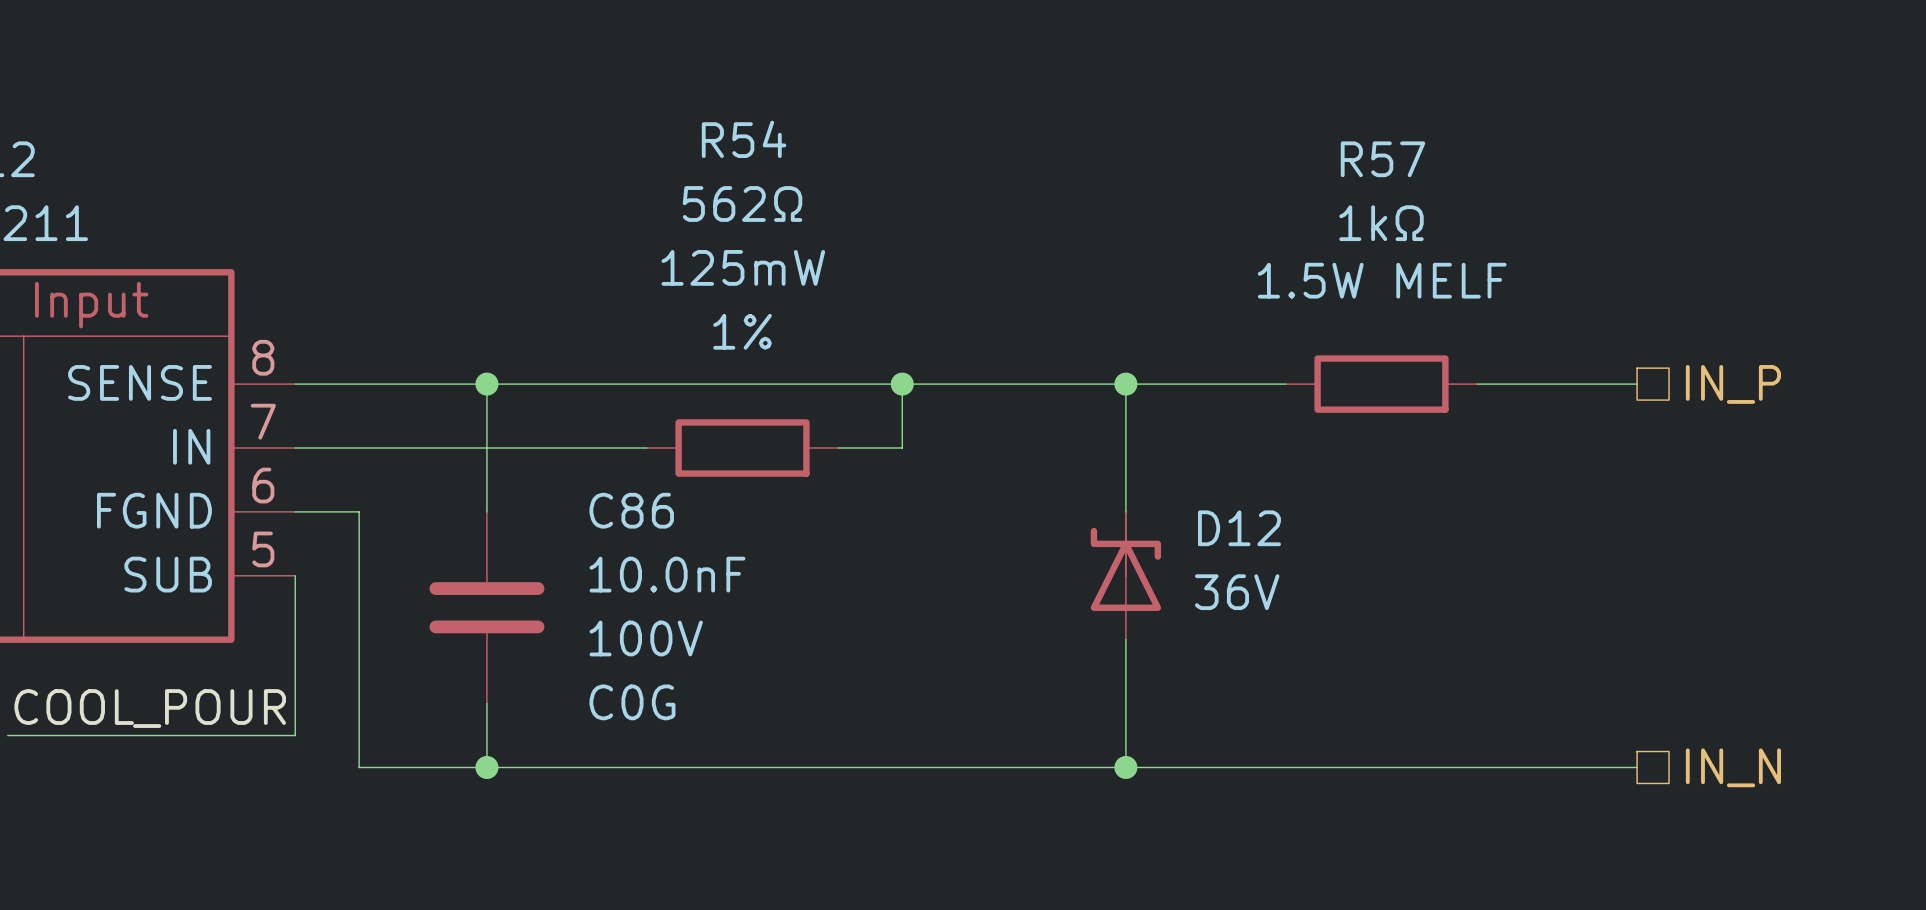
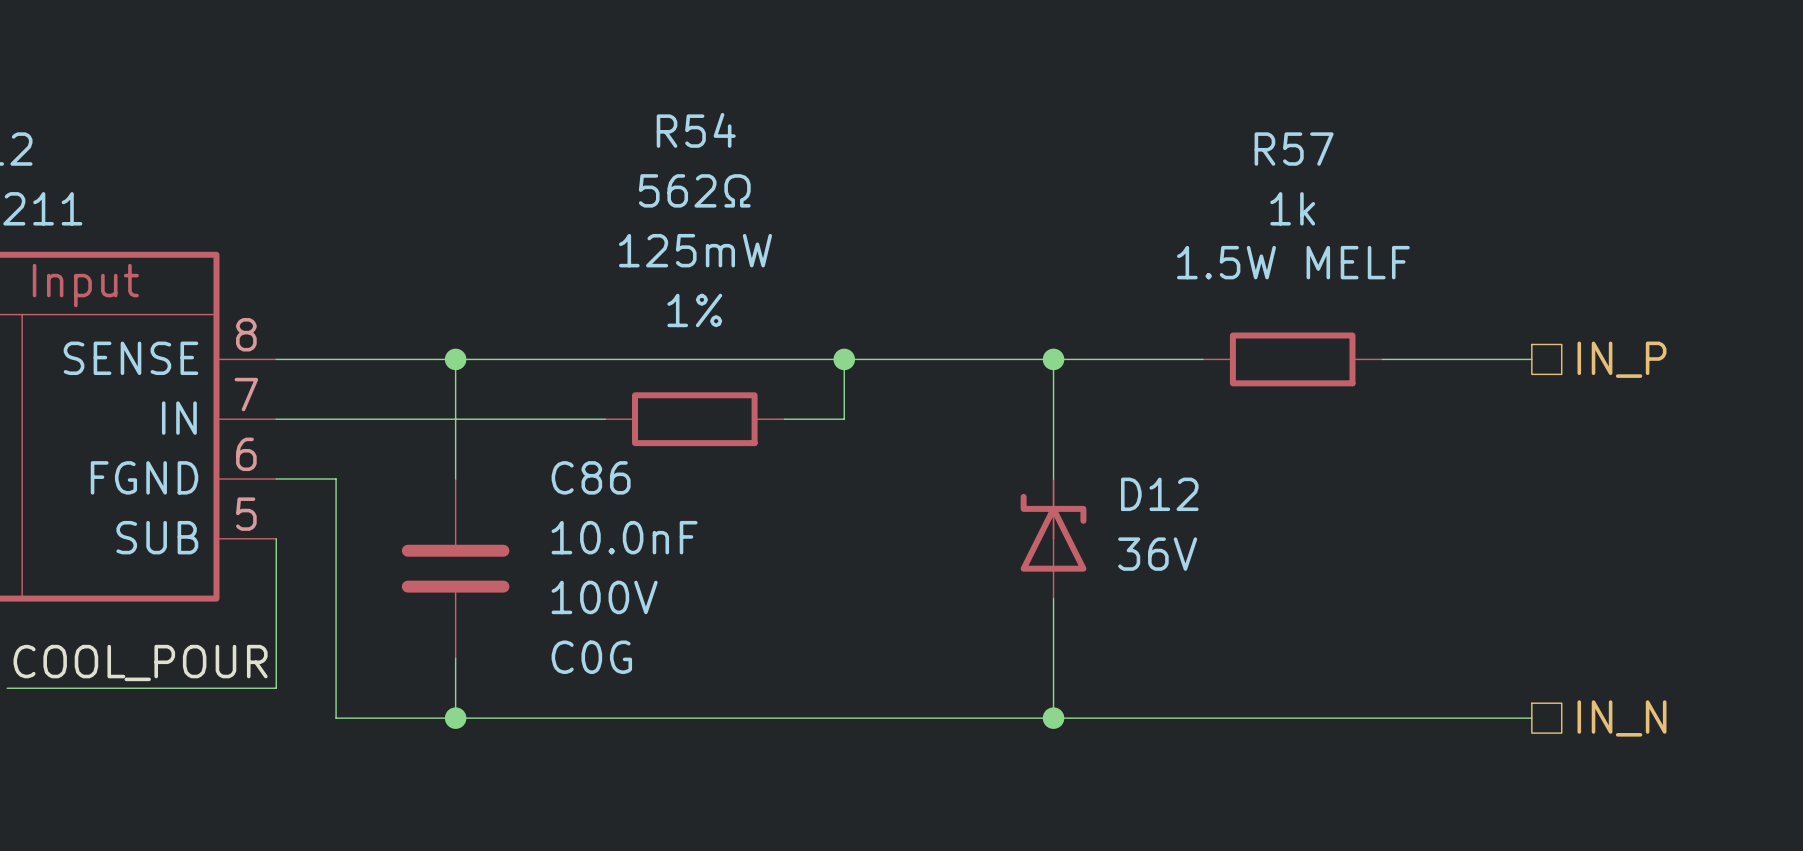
R57 value: 1kΩ (1381, 223) -> 1k (1292, 208)

